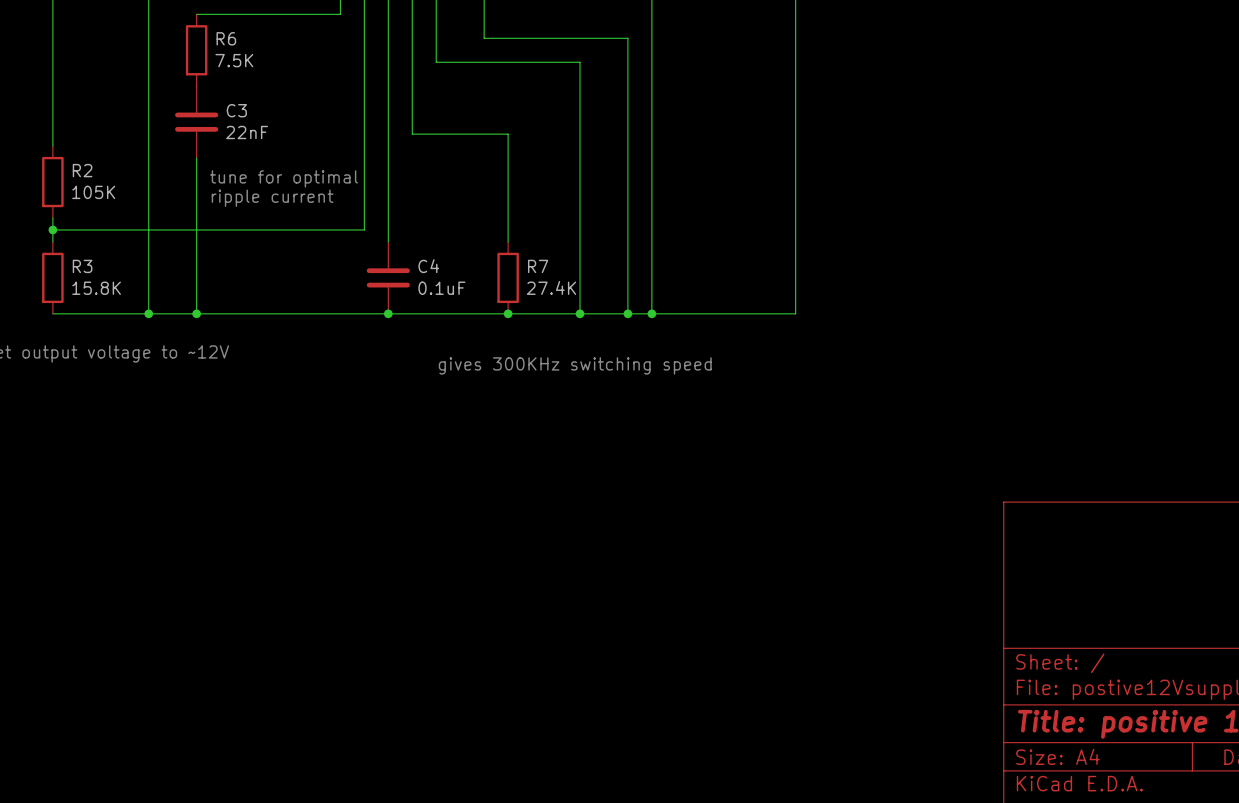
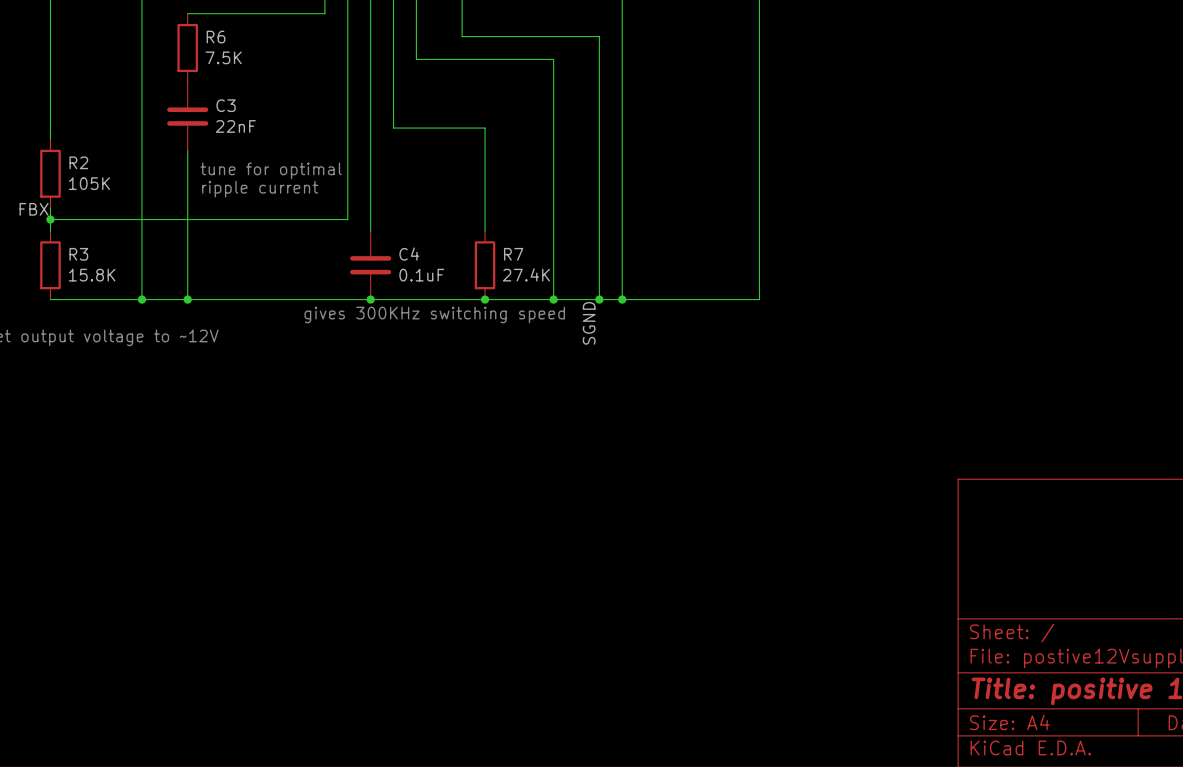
label: none -> FBX (34, 209)
label: none -> SGND (589, 323)
text position: gives 300KHz switching speed (575, 365) -> gives 300KHz switching speed (434, 314)

